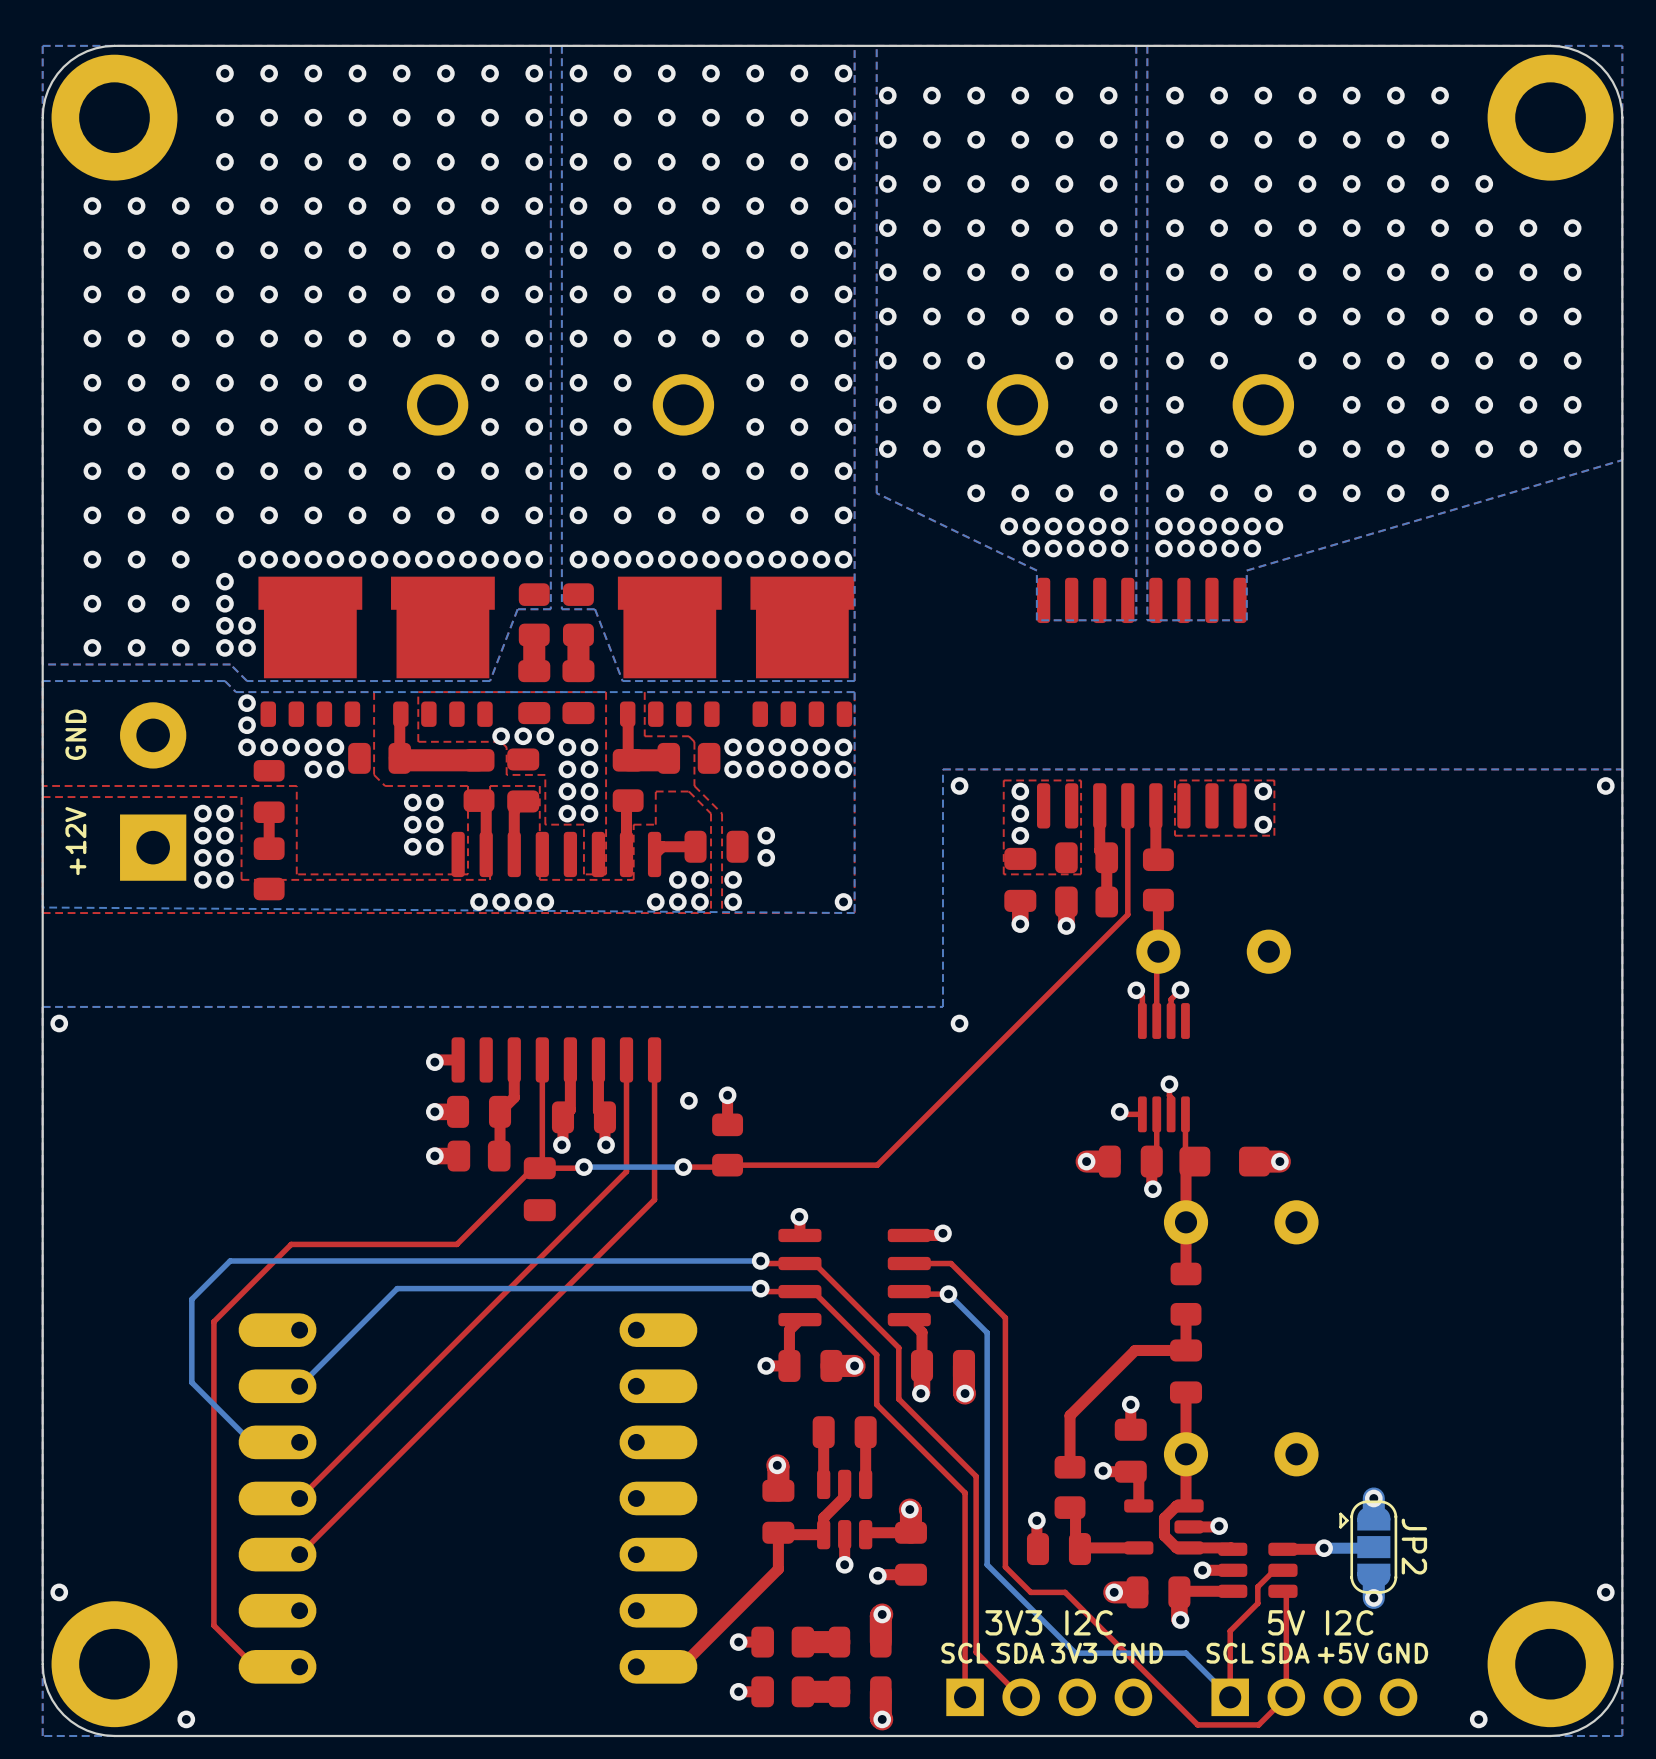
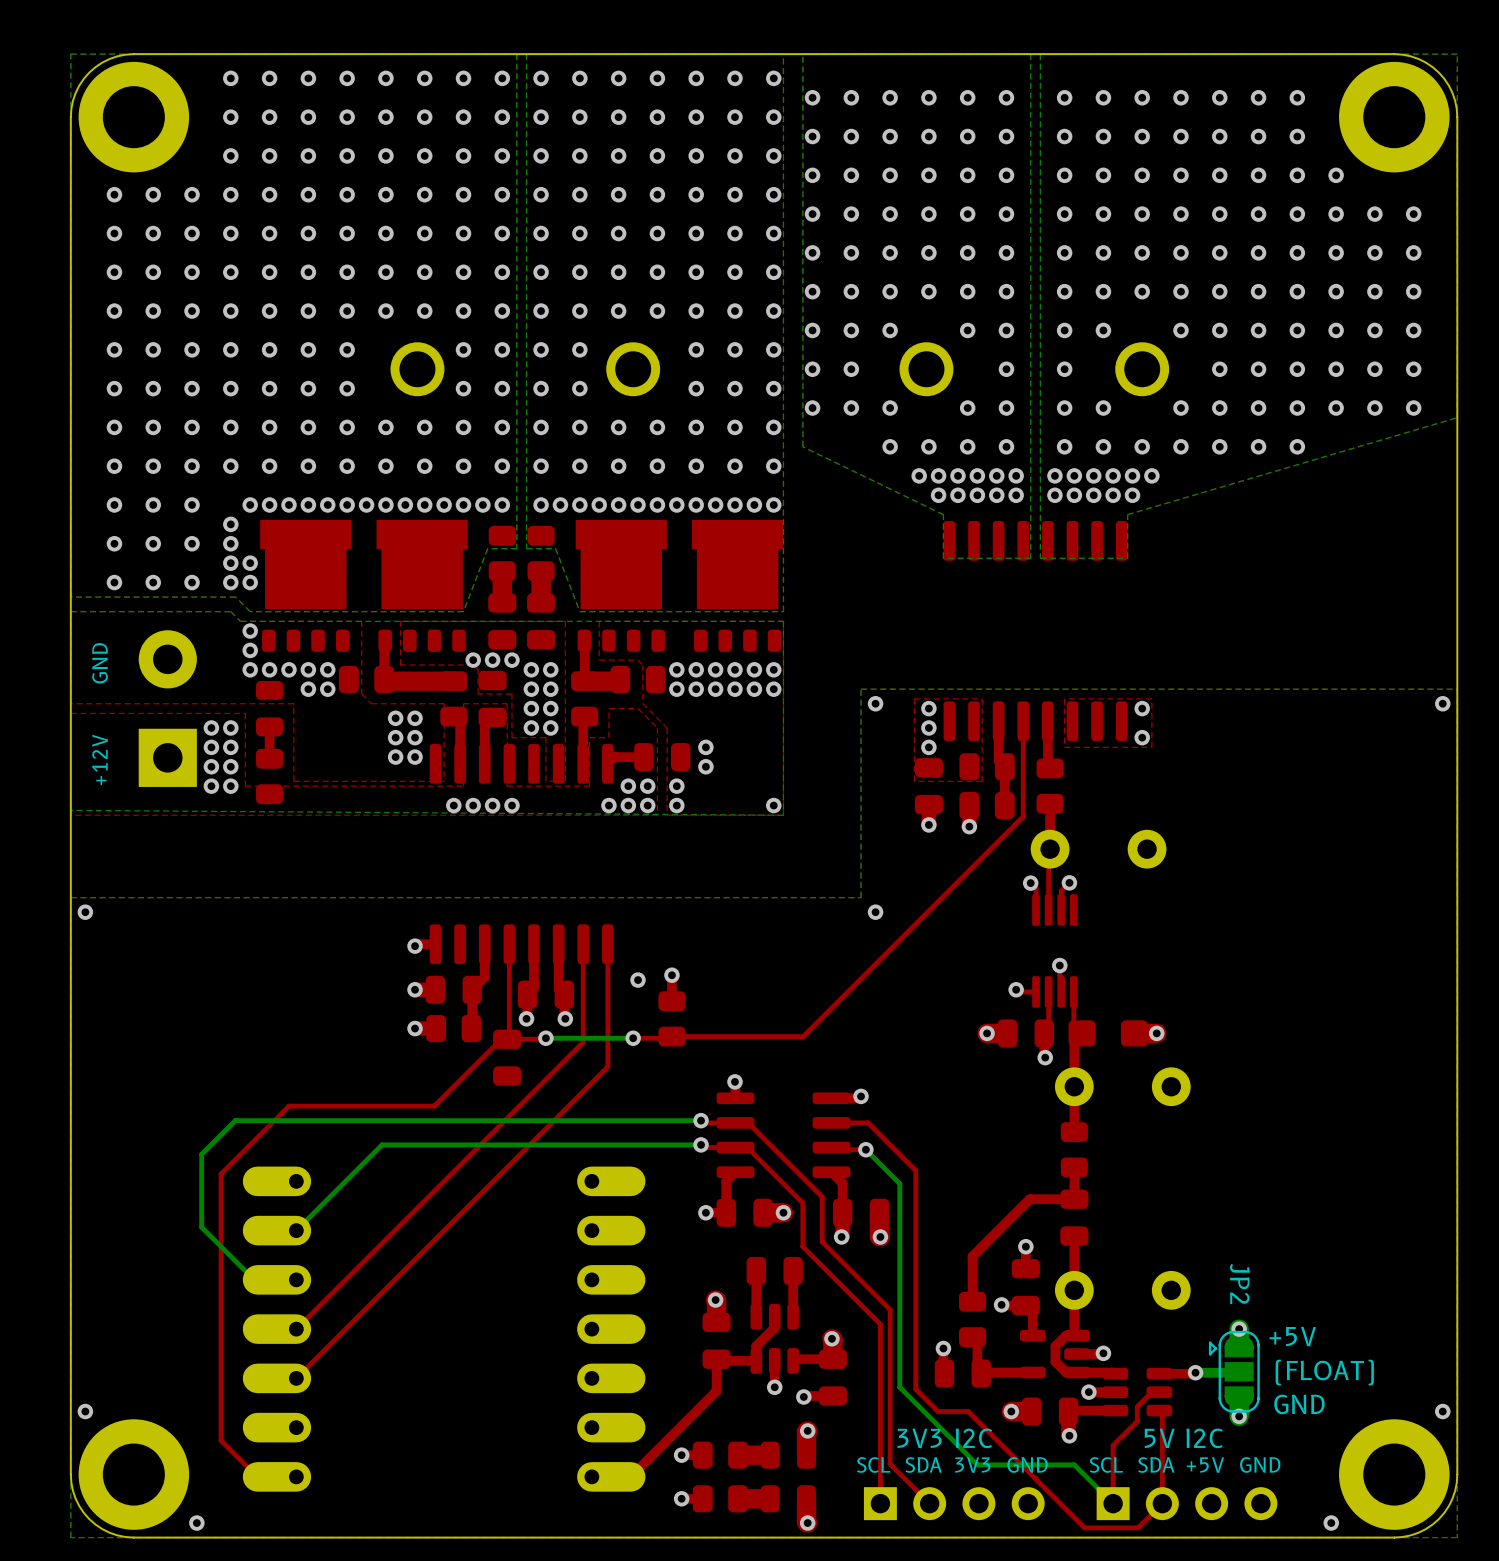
text: none -> +5V (1292, 1336)
JP2 name position: JP2 (1414, 1546) -> JP2 (1239, 1283)
text: none -> (FLOAT) (1324, 1372)
text: none -> GND (1299, 1404)

